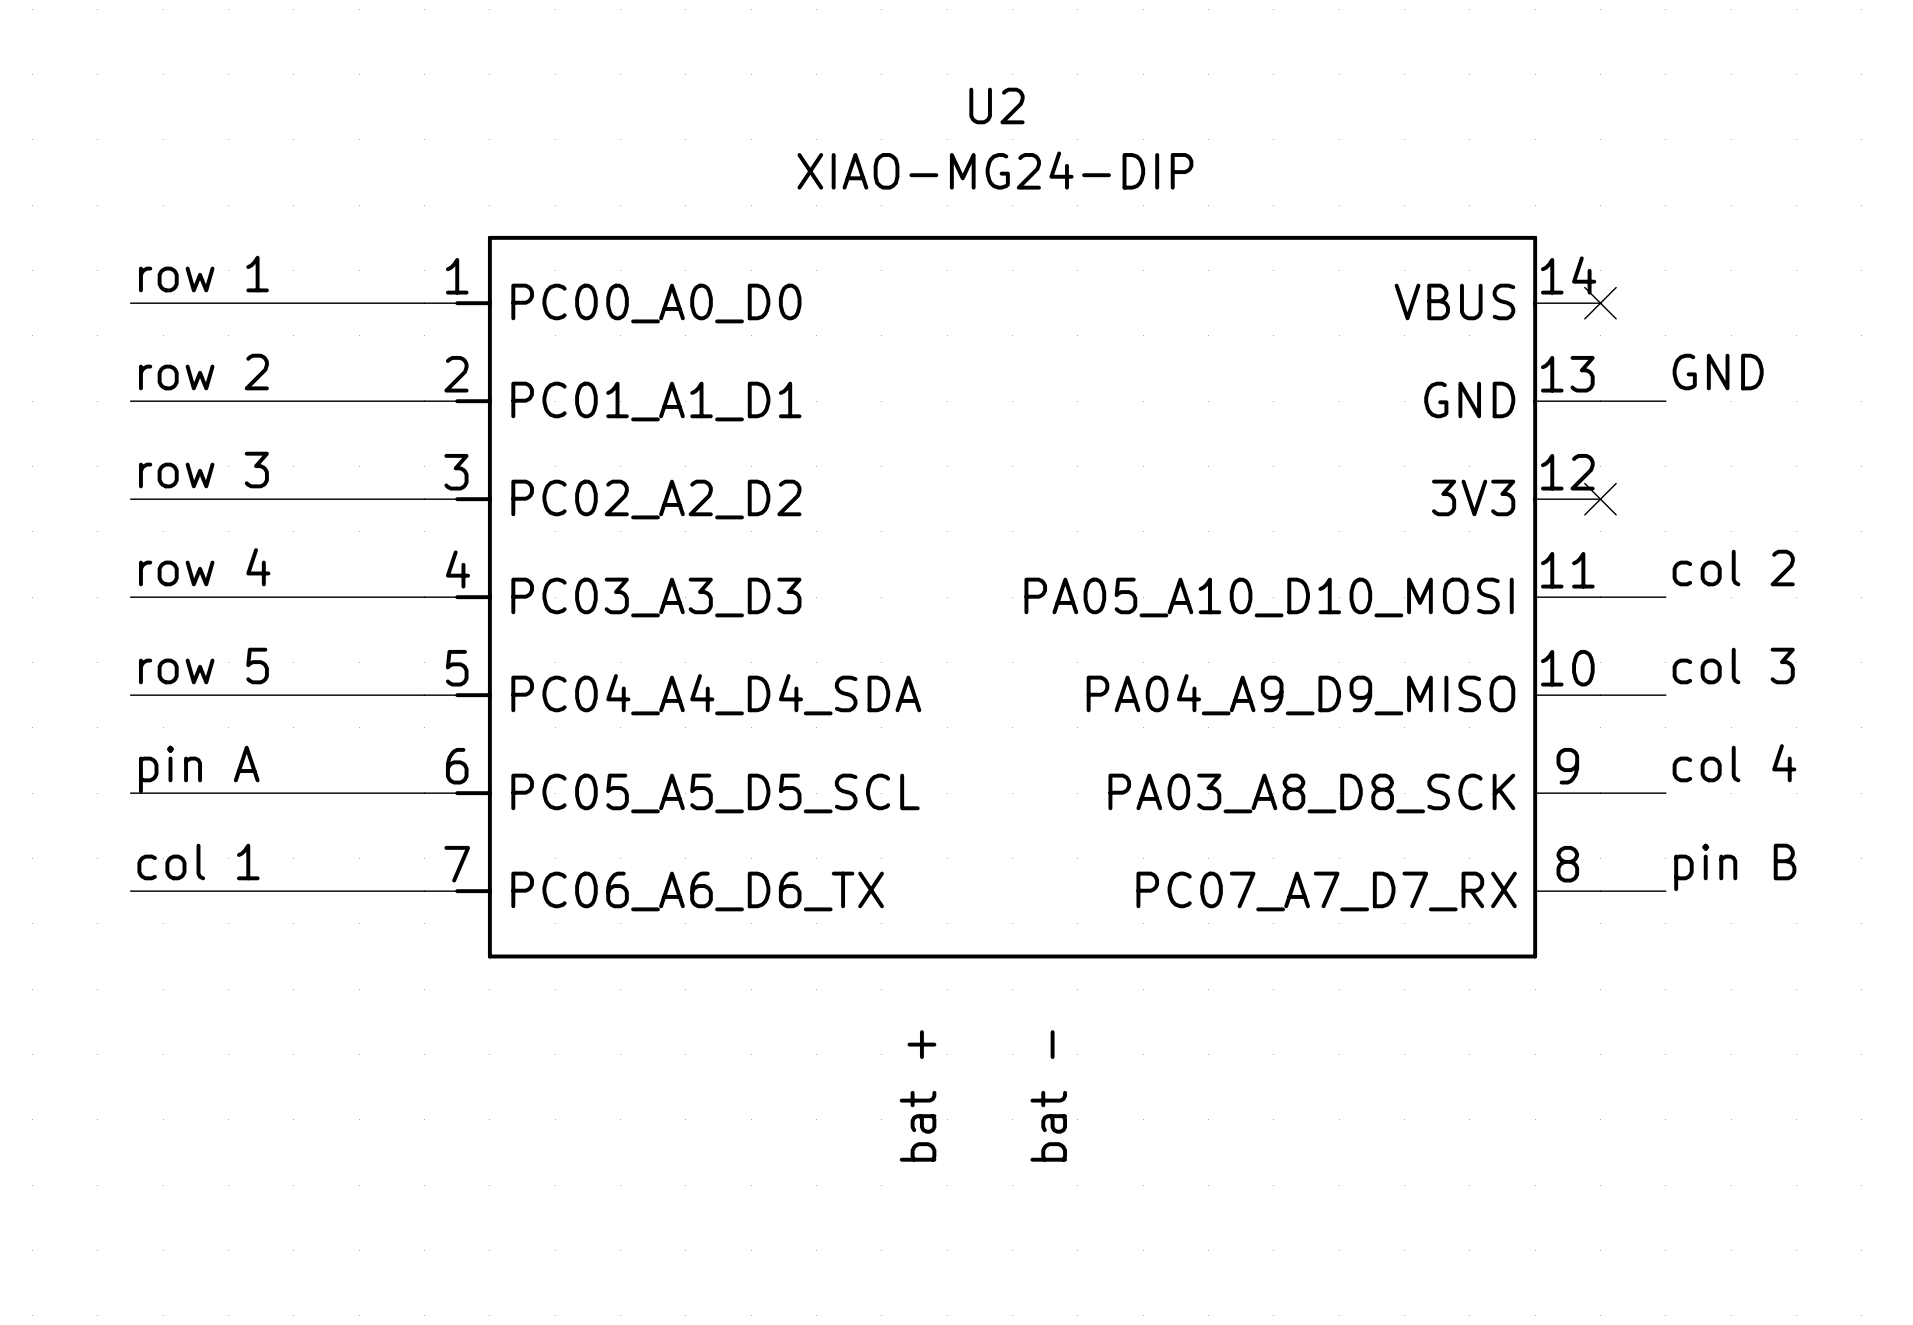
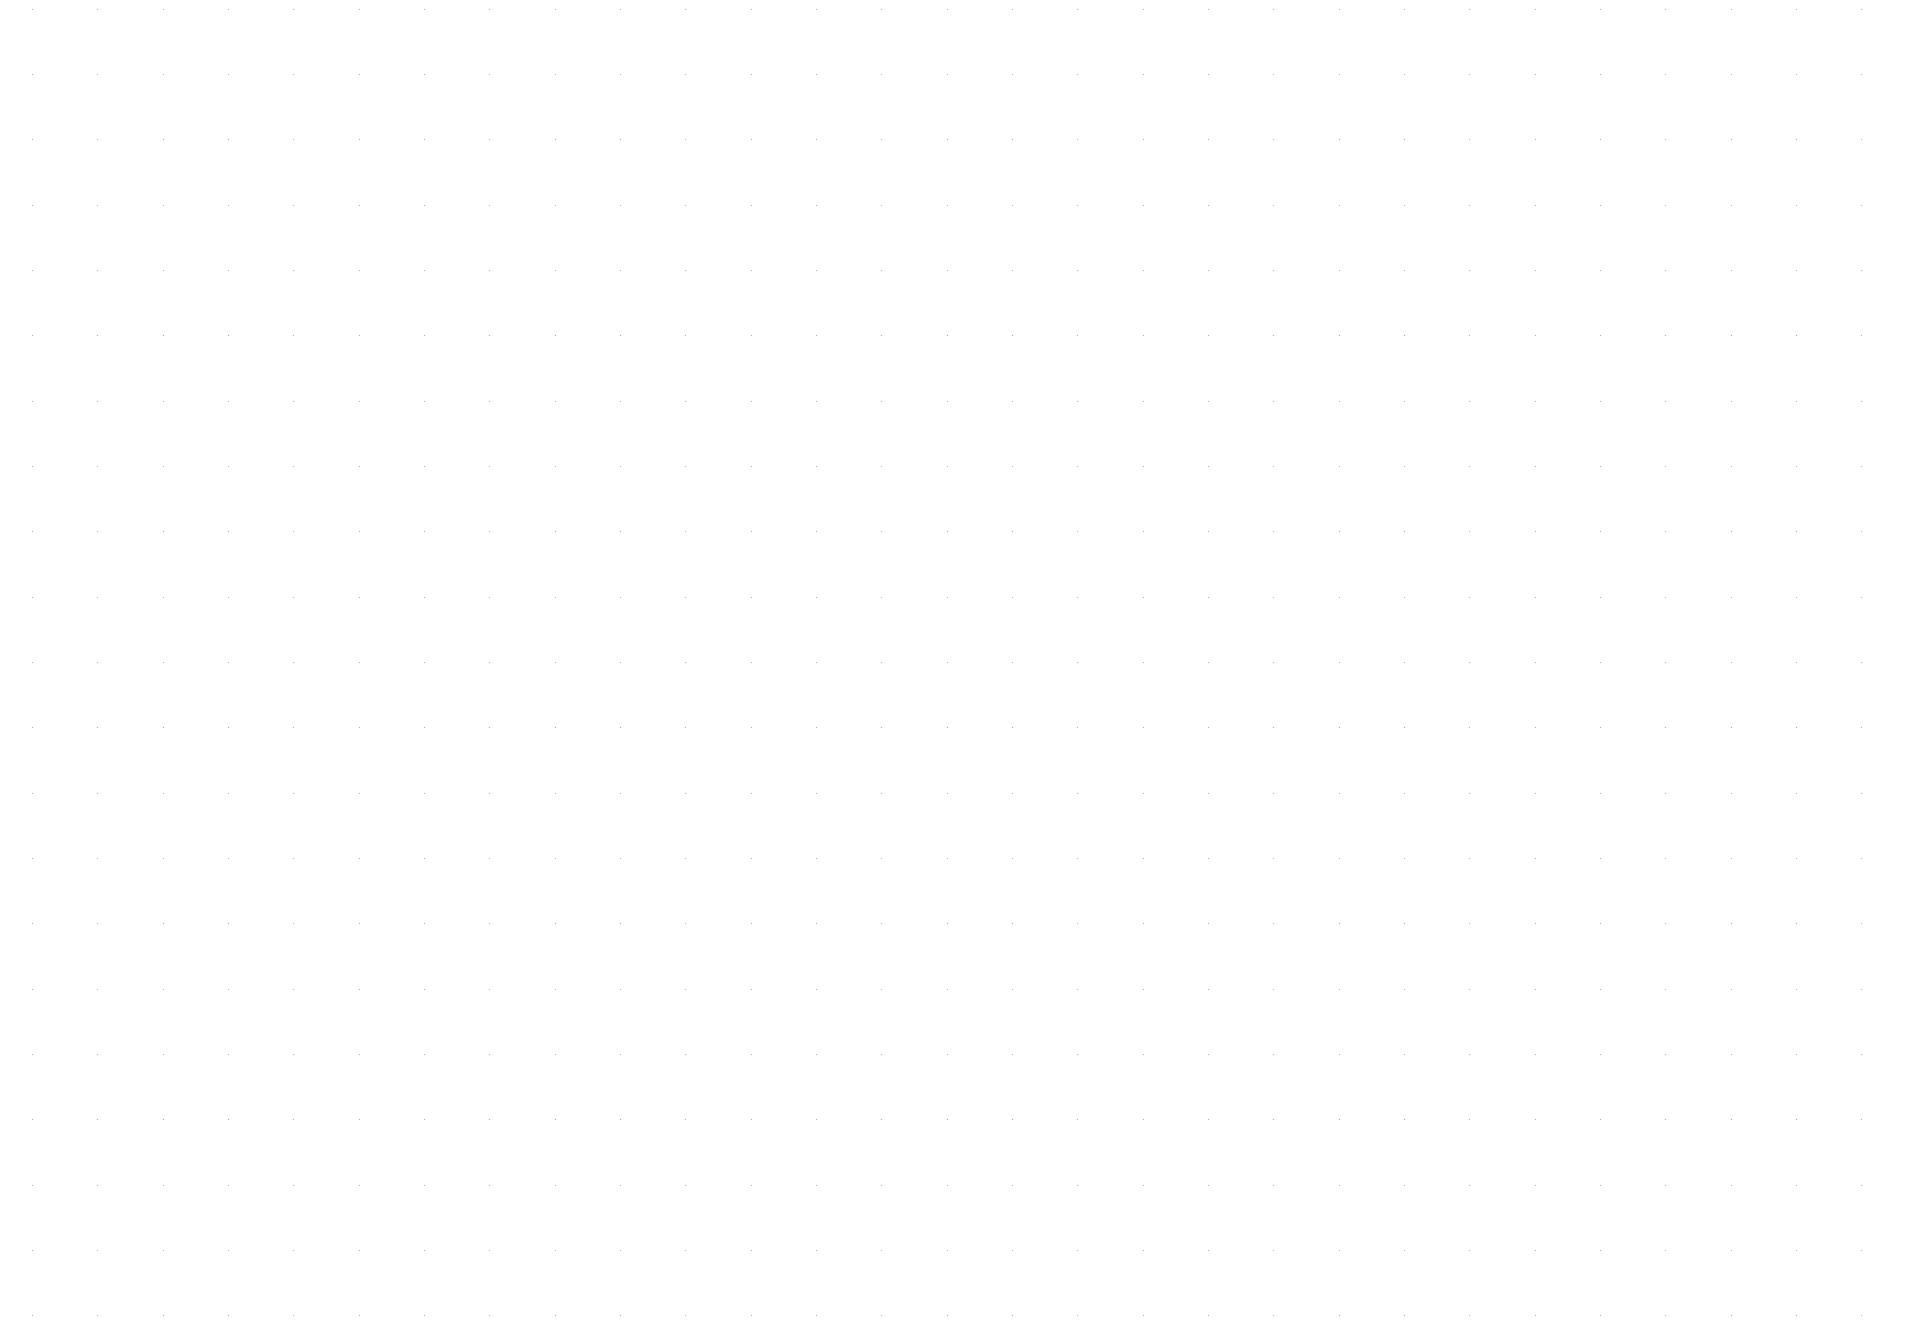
label: row 1 (203, 274) -> none
wire: (130, 303) (424, 303) -> none
no-connect mark: (1600, 303) -> none
label: row 2 (203, 372) -> none
label: GND (1718, 372) -> none
wire: (130, 401) (424, 401) -> none
wire: (1600, 401) (1665, 401) -> none
label: row 3 (203, 470) -> none
wire: (130, 499) (424, 499) -> none
no-connect mark: (1600, 499) -> none
label: row 4 (204, 567) -> none
label: col 2 (1733, 568) -> none
wire: (130, 597) (424, 597) -> none
U2: XIAO-MG24-DIP (1012, 597) -> none
wire: (1600, 597) (1665, 597) -> none
label: row 5 (203, 666) -> none
label: col 3 (1733, 666) -> none
wire: (130, 695) (424, 695) -> none
wire: (1600, 695) (1665, 695) -> none
label: col 4 (1734, 763) -> none
label: pin A (199, 769) -> none
wire: (130, 793) (424, 793) -> none
wire: (1600, 793) (1665, 793) -> none
label: col 1 (198, 862) -> none
label: pin B (1735, 867) -> none
wire: (130, 891) (424, 891) -> none
wire: (1600, 891) (1665, 891) -> none
label: bat + (918, 1095) -> none
label: bat - (1048, 1095) -> none

